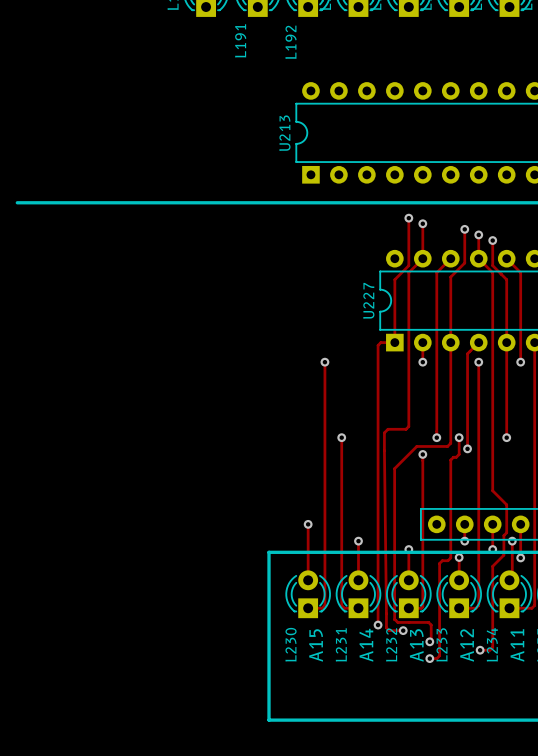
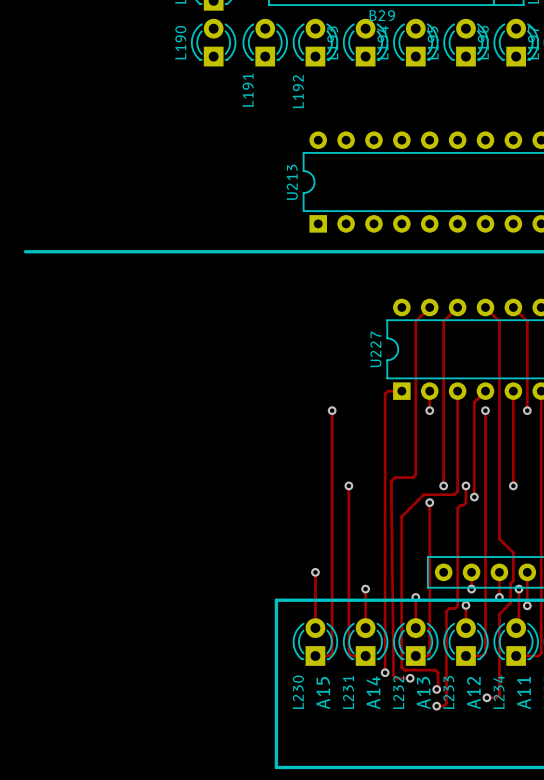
track: (408, 218) (408, 265) (394, 279) (394, 342) -> none
via: (408, 218) -> none
track: (422, 223) (422, 258) -> none
via: (422, 223) -> none
track: (464, 229) (464, 263) (450, 277) (450, 342) -> none
via: (464, 229) -> none
track: (478, 234) (478, 258) -> none
via: (478, 234) -> none
track: (492, 240) (492, 265) (506, 279) (506, 342) -> none
via: (492, 240) -> none

